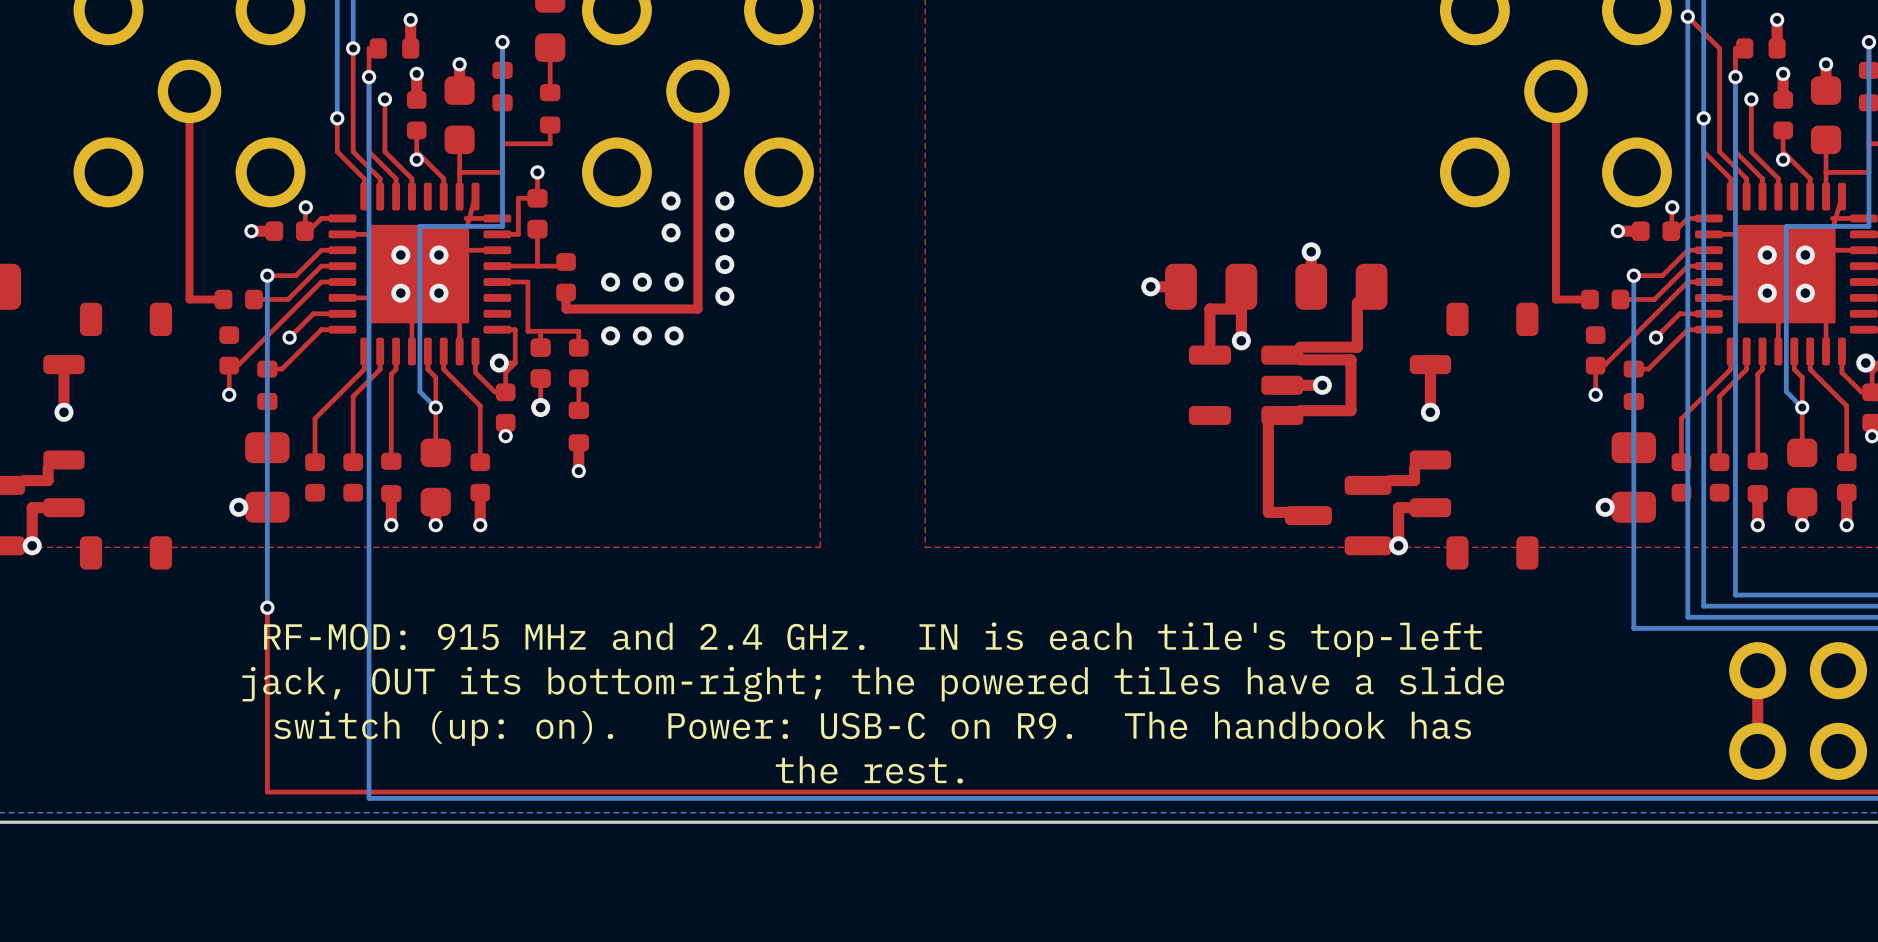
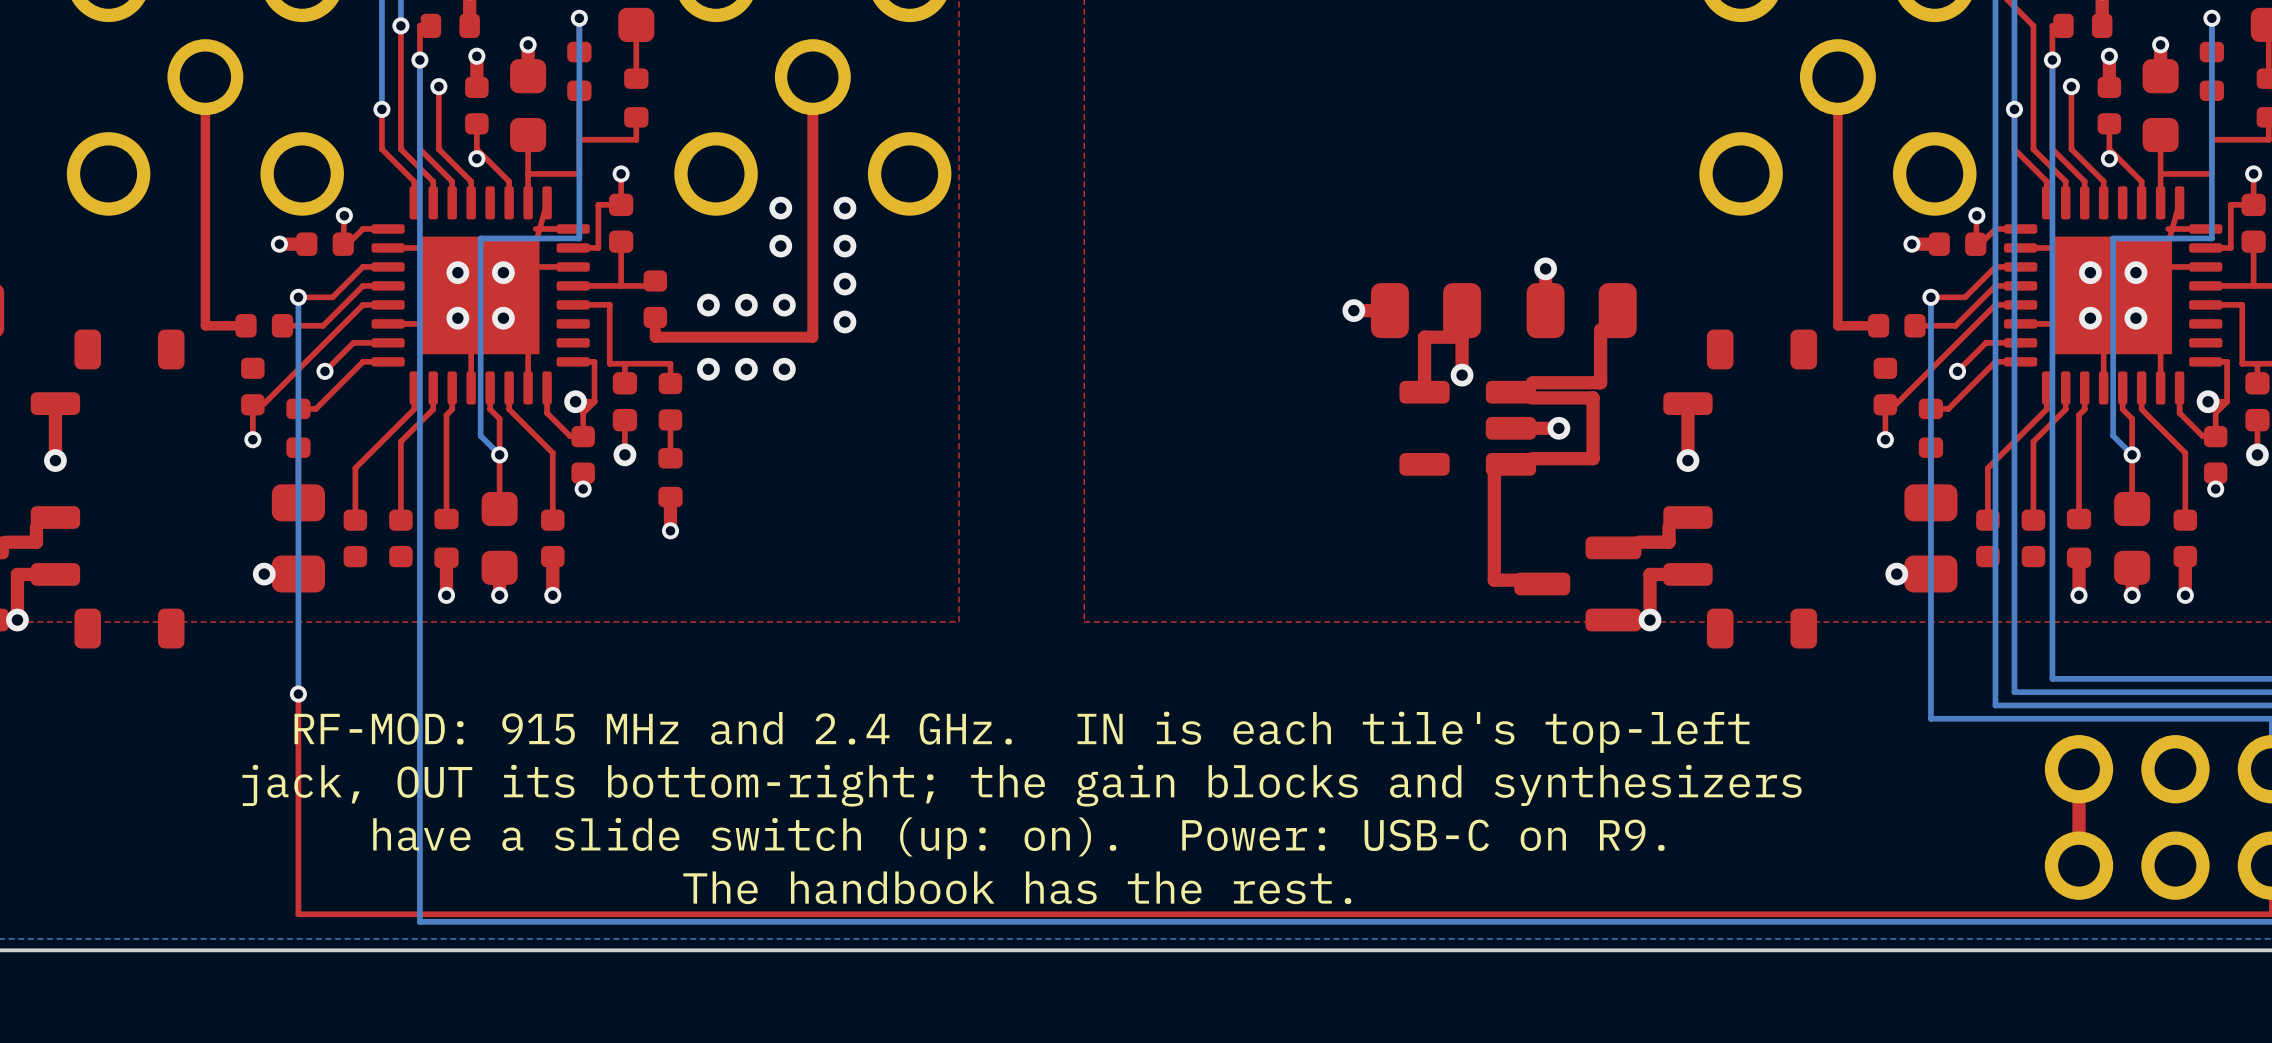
text: jack, OUT its bottom-right; the powered tiles have a slide (873, 684) -> jack, OUT its bottom-right; the gain blocks and synthesizers (1022, 785)
text: switch (up: on). Power: USB-C on R9. The handbook has (872, 728) -> have a slide switch (up: on). Power: USB-C on R9. (1018, 838)
text: the rest. (869, 769) -> The handbook has the rest. (1017, 887)

